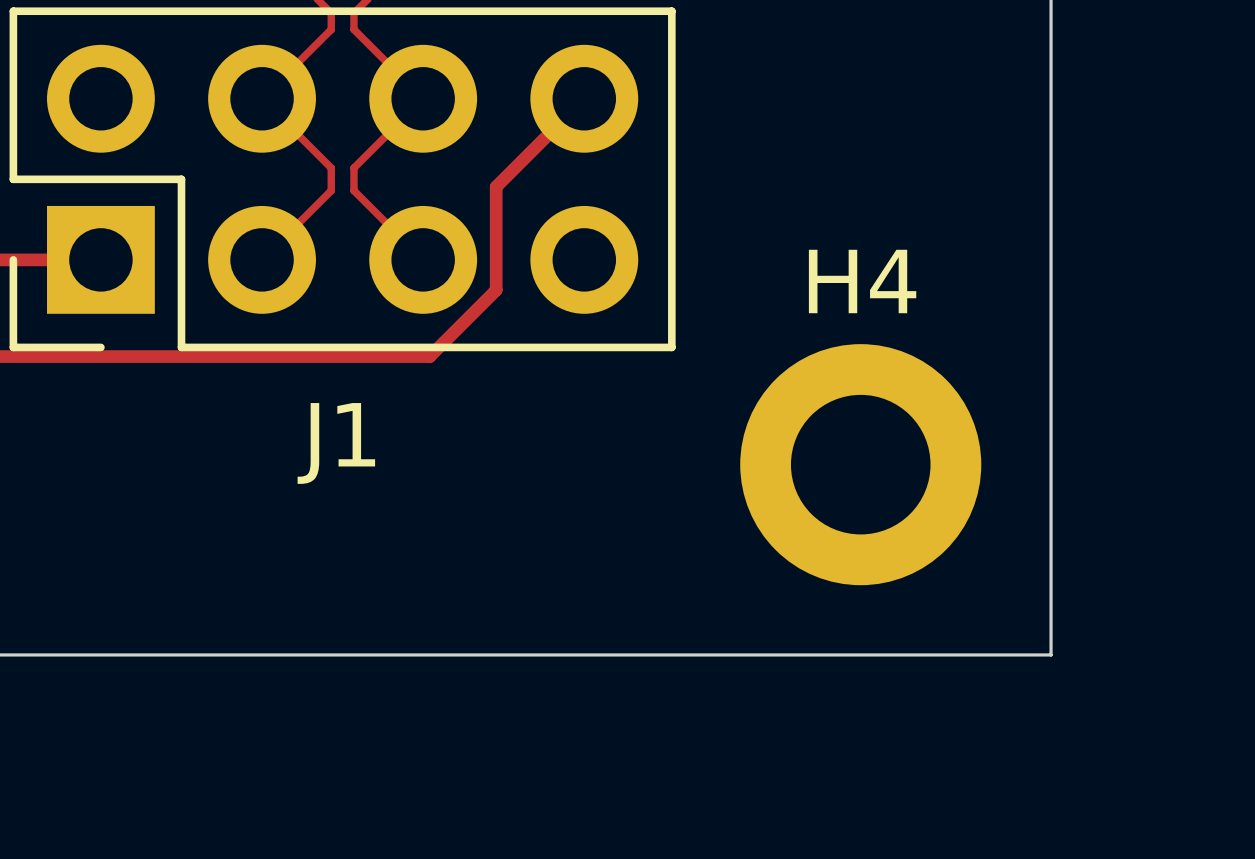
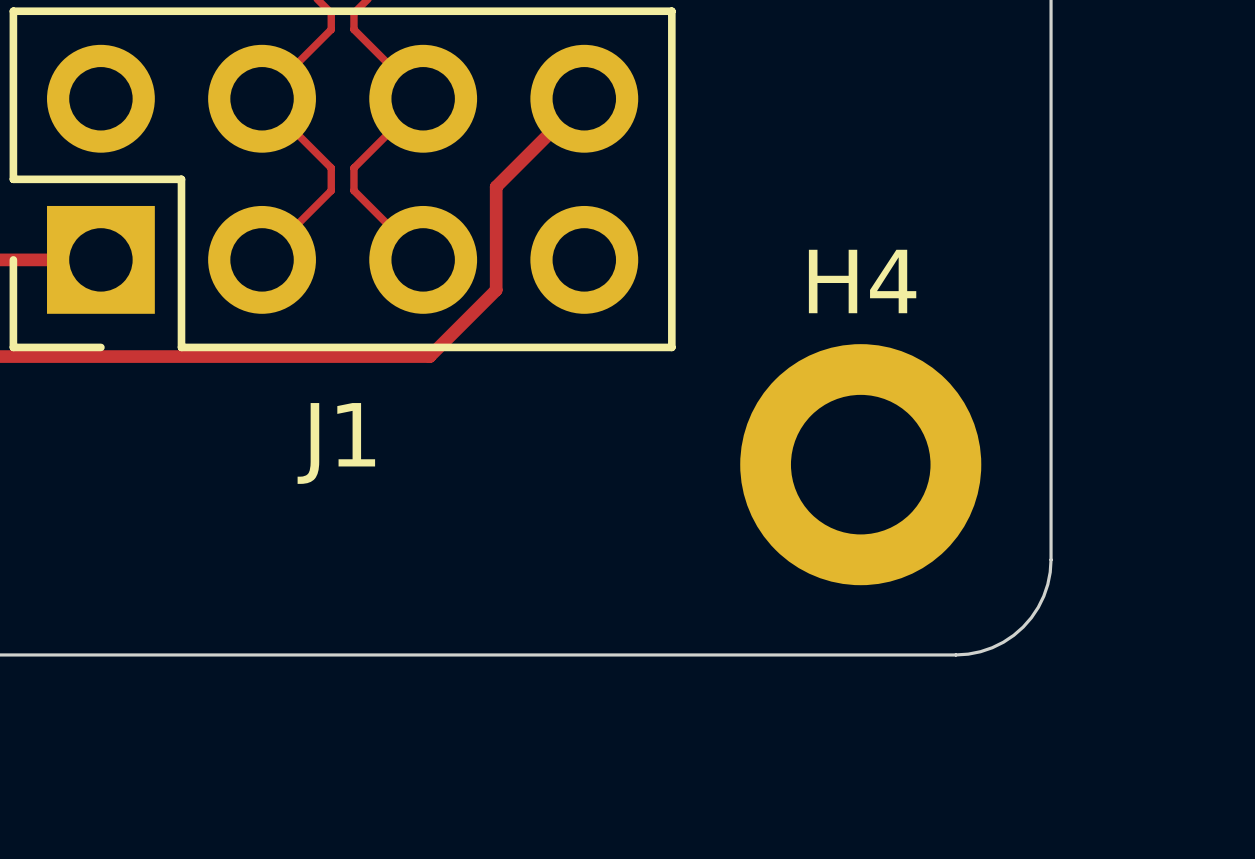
board edge: (1051, 559) (1051, 654) (955, 654) -> (1051, 559) (1047, 584) (1043, 596) (1031, 617) (1023, 627) (1003, 642) (992, 647) (968, 654) (955, 654)

